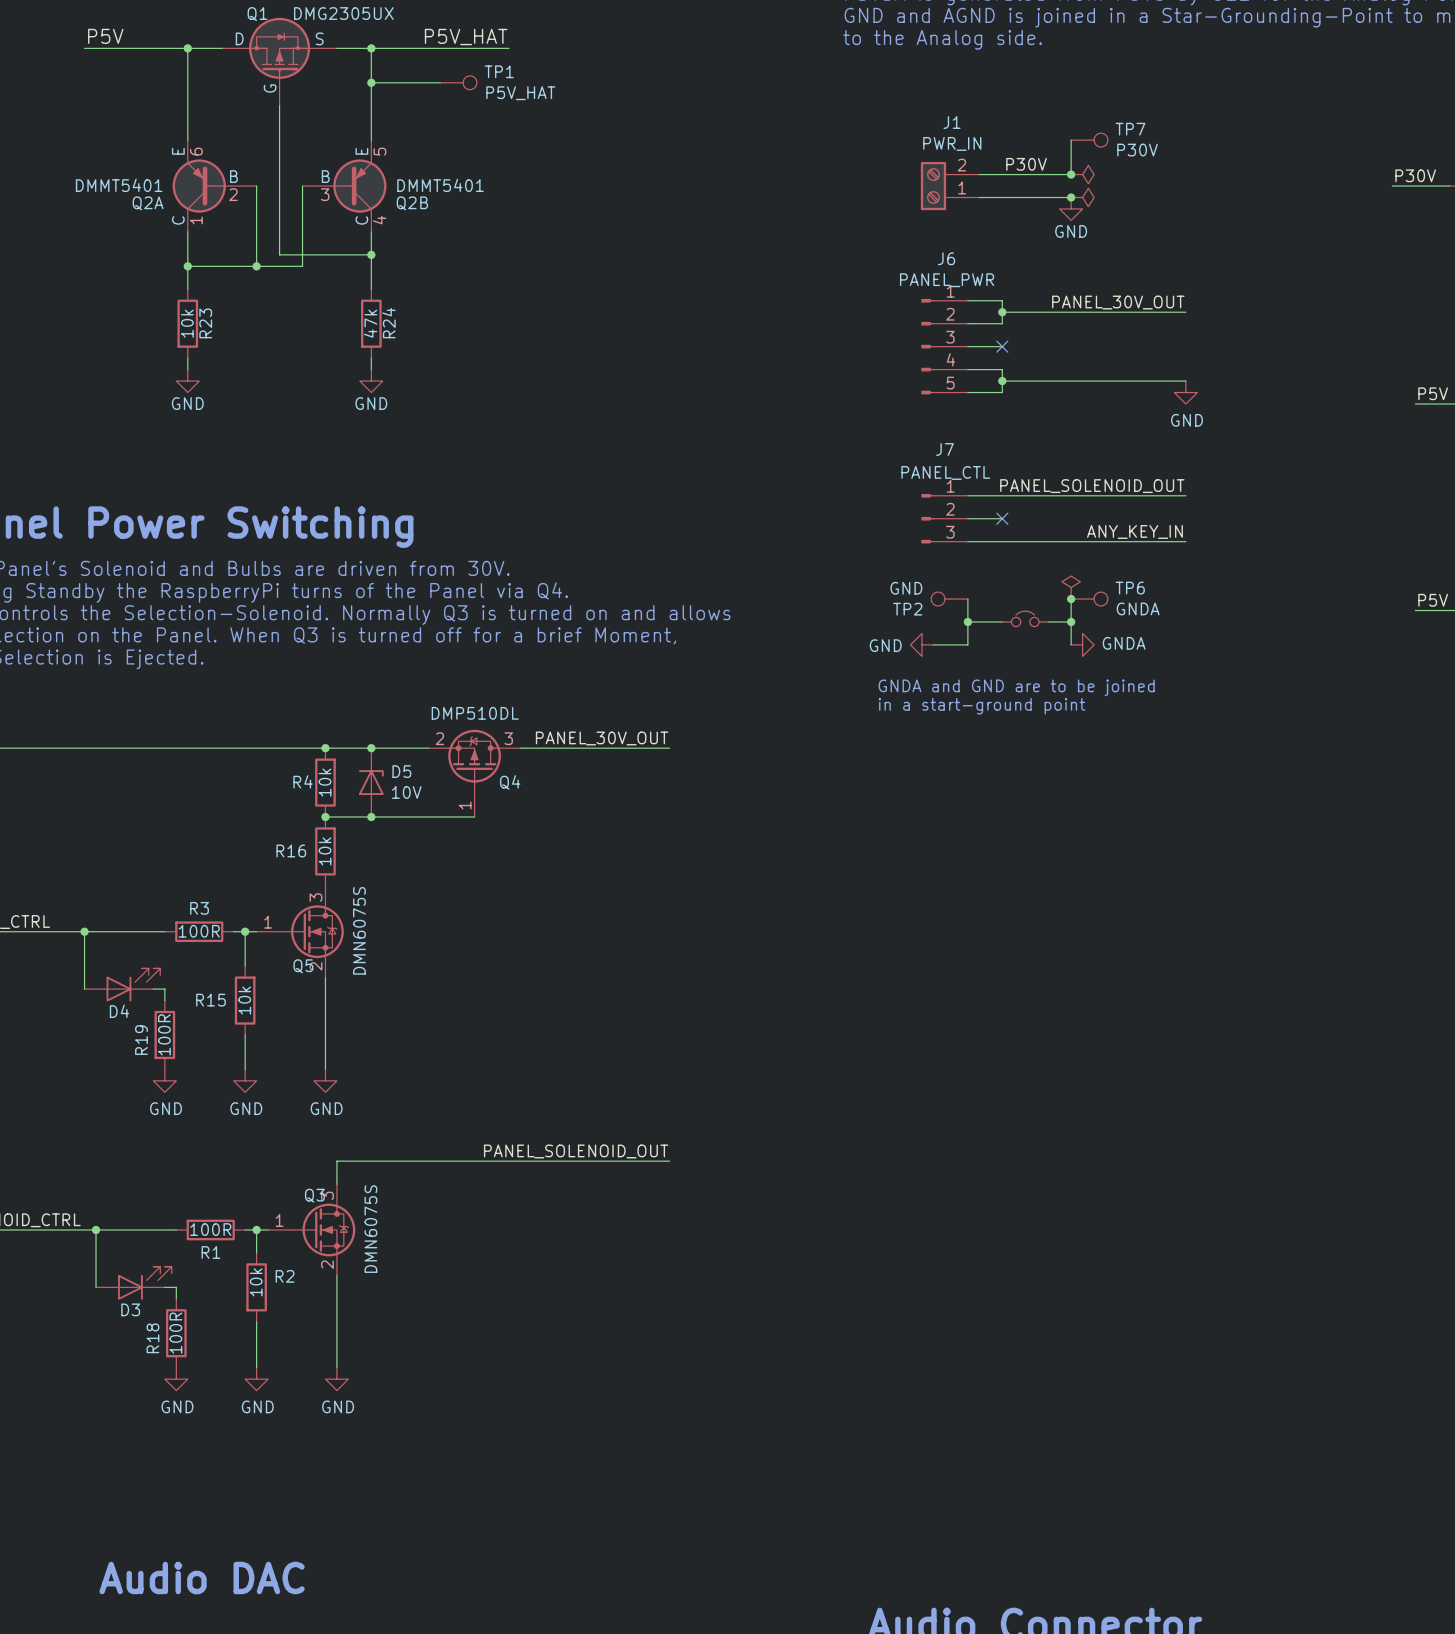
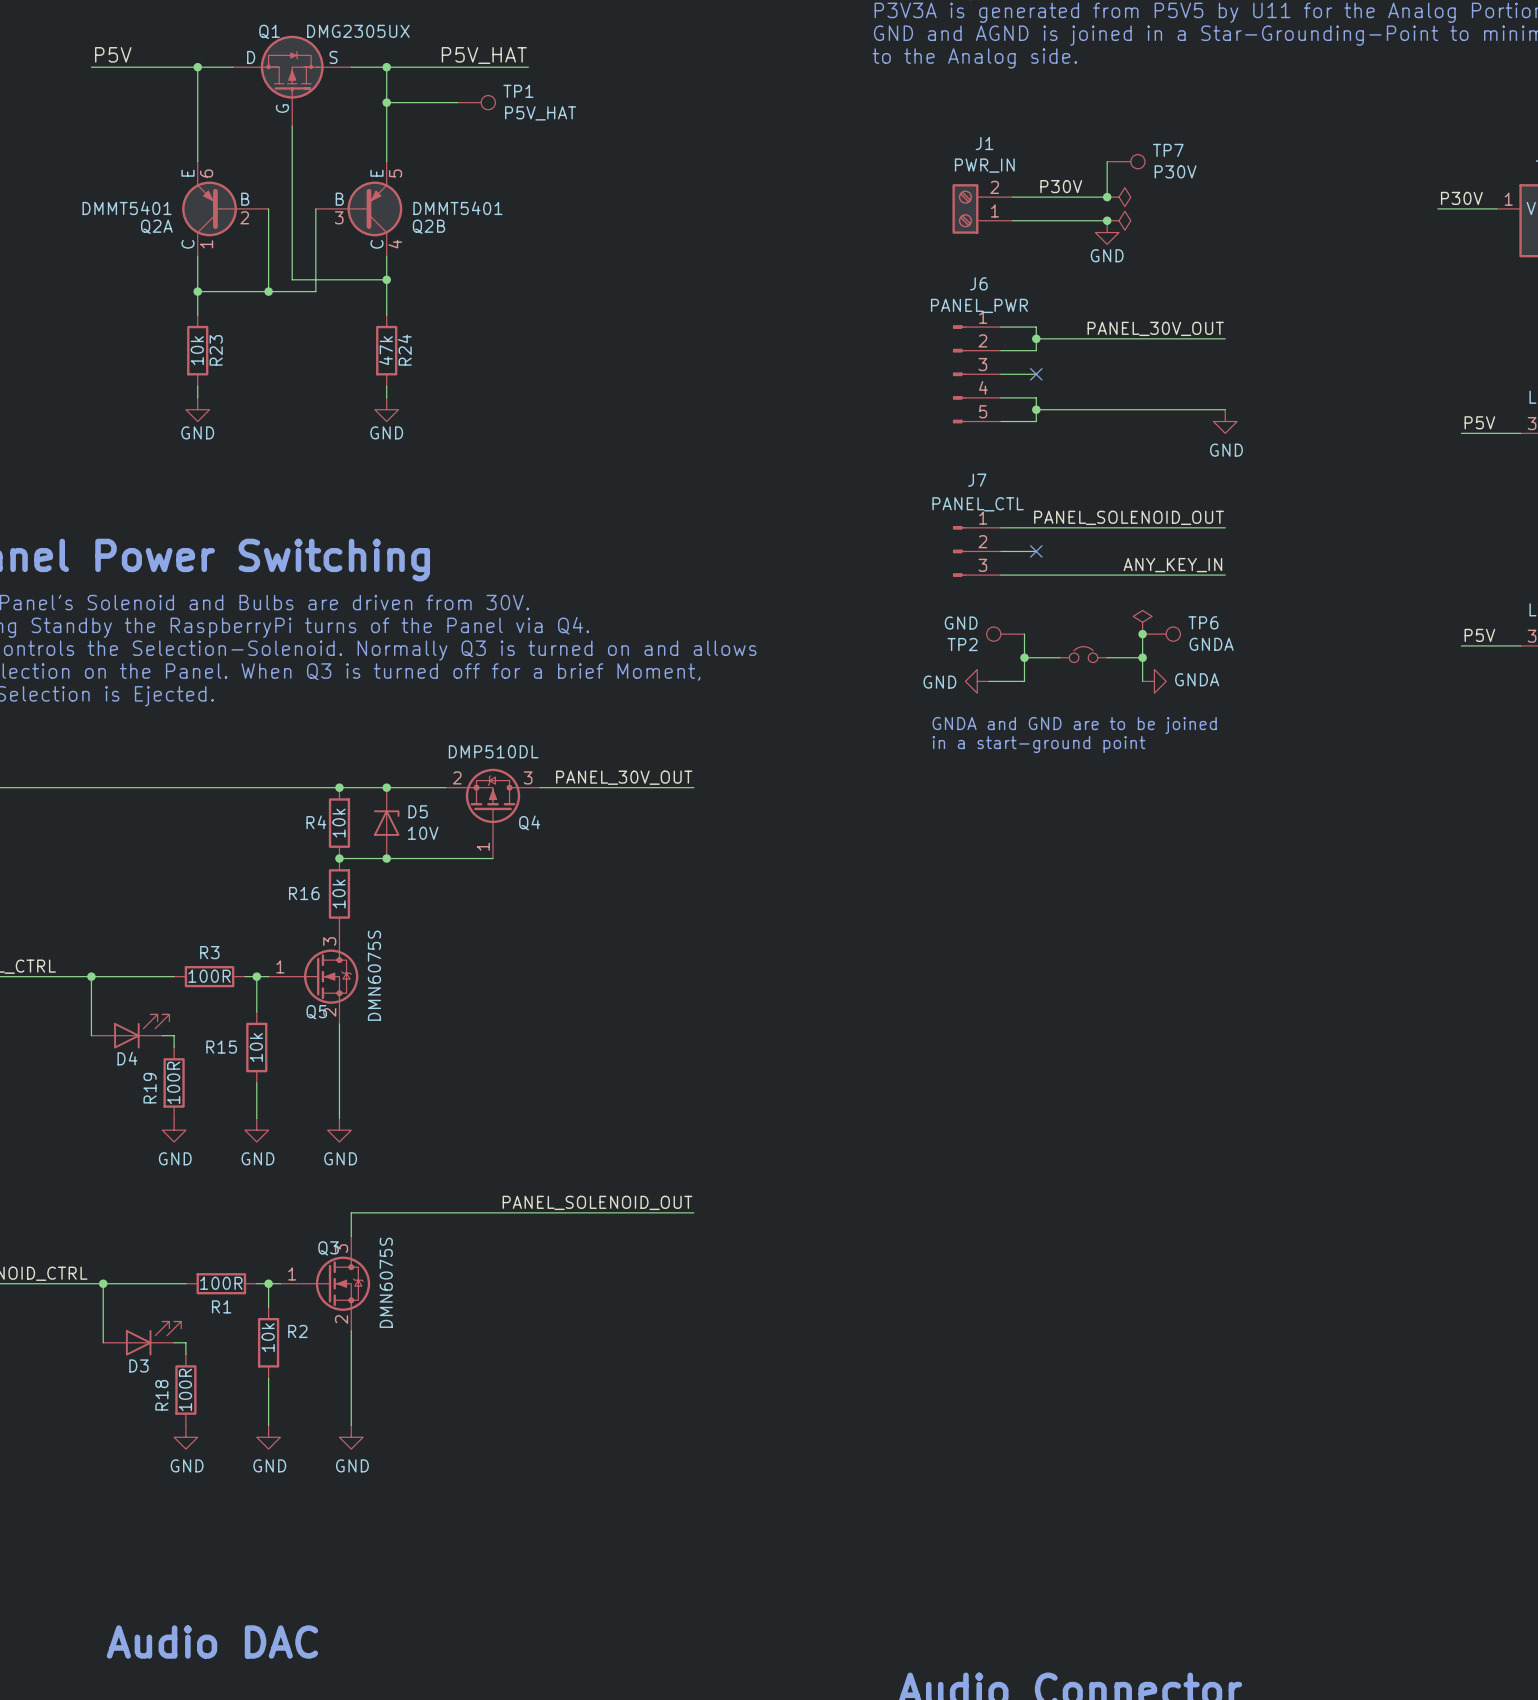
power symbol position: (1071, 587) -> (1142, 622)
TP2 position: (949, 599) -> (1005, 634)
wire: (967, 599) (967, 644) -> (1024, 634) (1024, 681) (1000, 681)
wire: (1071, 599) (1071, 644) -> (1142, 634) (1142, 681)
junction: (1071, 599) -> none
TP6 position: (1089, 599) -> (1161, 634)
junction: none -> (1142, 634)
part position: (1025, 618) -> (1083, 654)
wire: (967, 621) (990, 621) -> (1036, 657) (1059, 657)
junction position: (967, 621) -> (1024, 657)
wire: (1048, 621) (1071, 621) -> (1142, 657) (1107, 657)
junction: (1071, 621) -> none
junction: none -> (1142, 657)
power symbol position: GND (922, 644) -> GND (977, 681)
power symbol position: GNDA (1082, 644) -> GNDA (1154, 681)
text position: GNDA and GND are to be joined (1016, 687) -> GNDA and GND are to be joined (1074, 725)
text position: in a start-ground point (981, 706) -> in a start-ground point (1038, 744)

